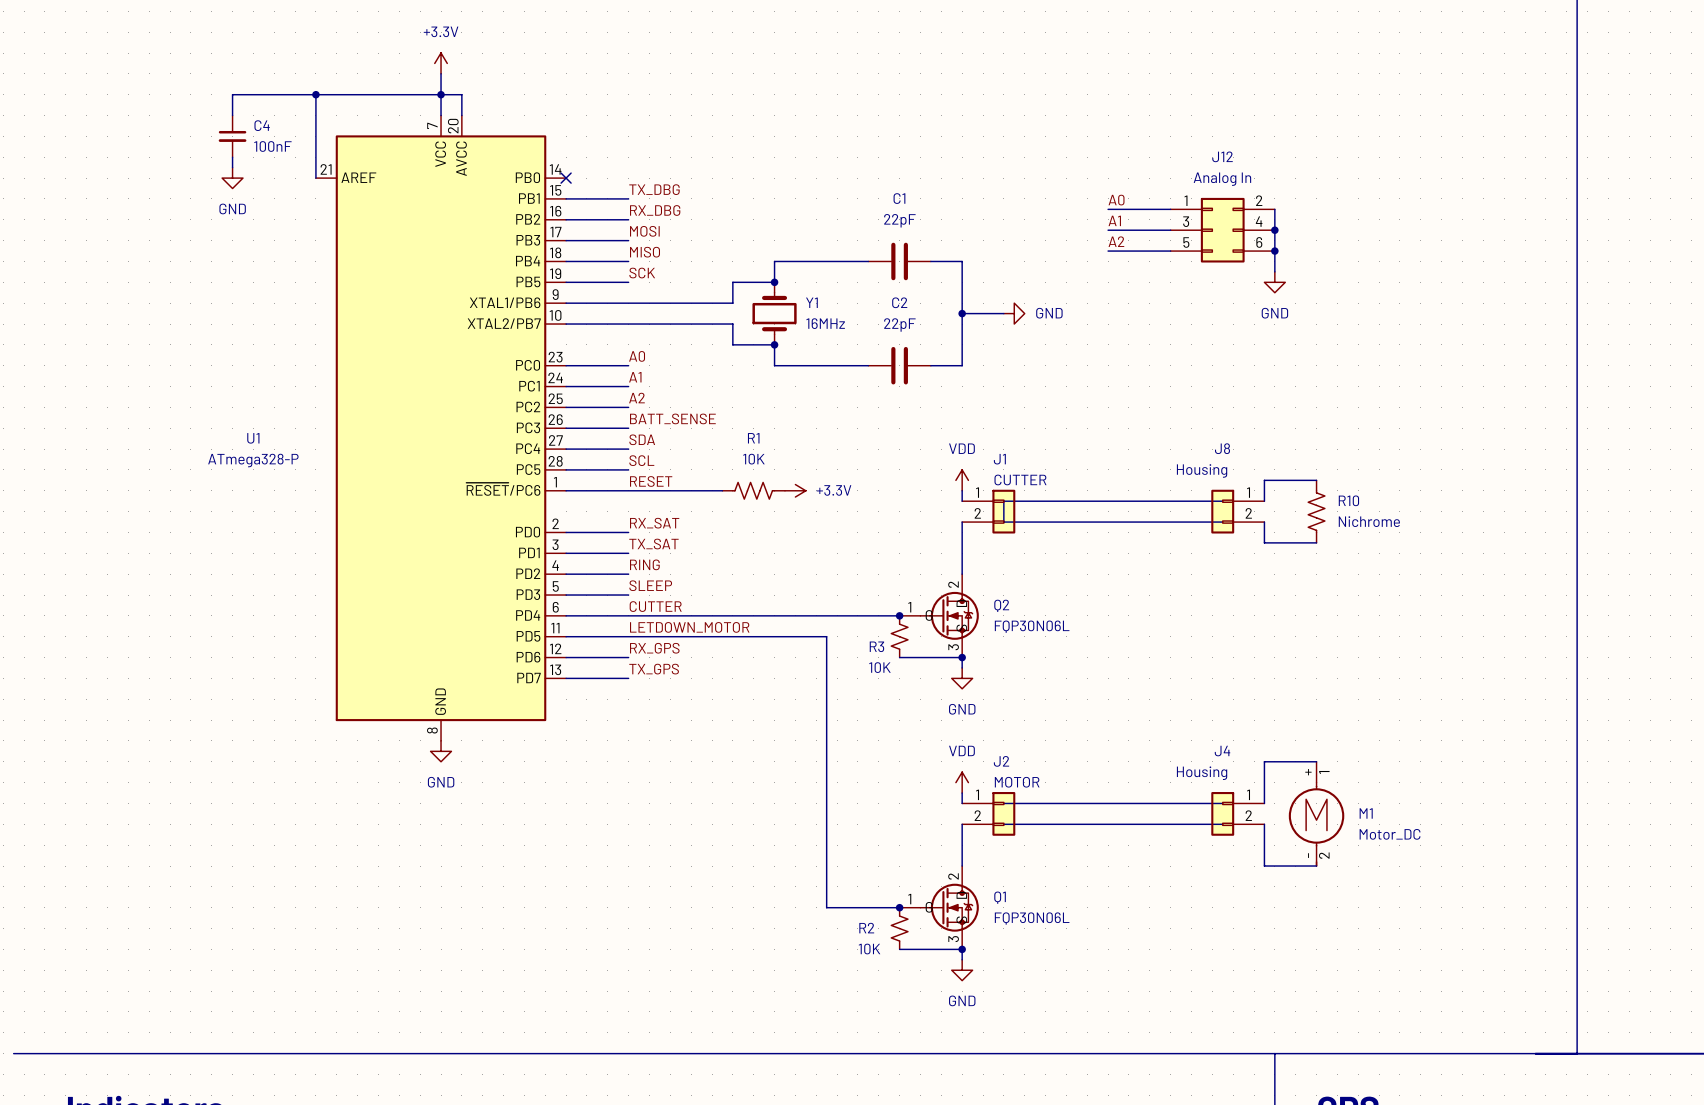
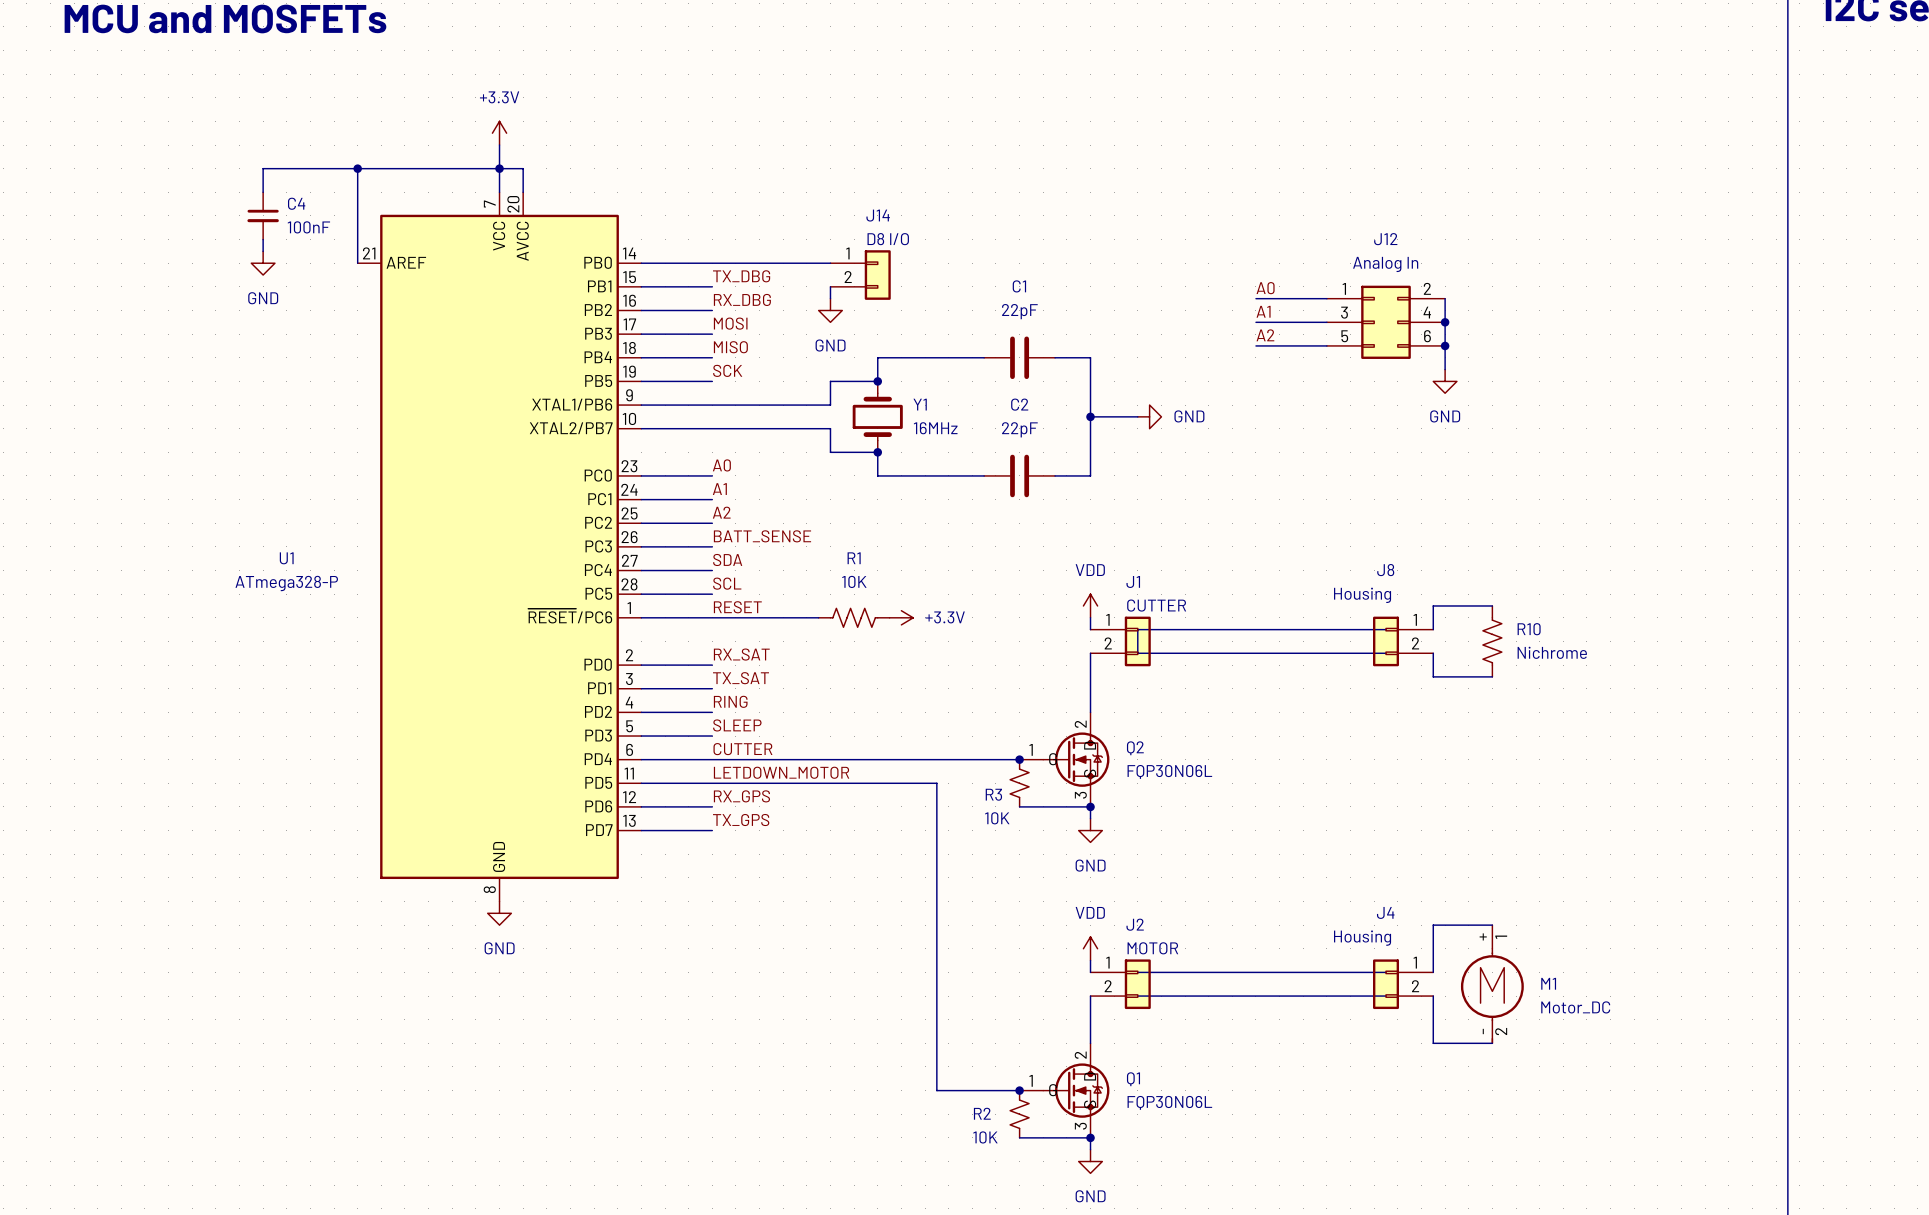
wire: none -> (641, 263) (830, 263)
no-connect mark: (566, 178) -> none
J14: none -> D8 I/O (860, 275)
wire: none -> (830, 286) (830, 298)
power symbol: none -> GND (830, 310)

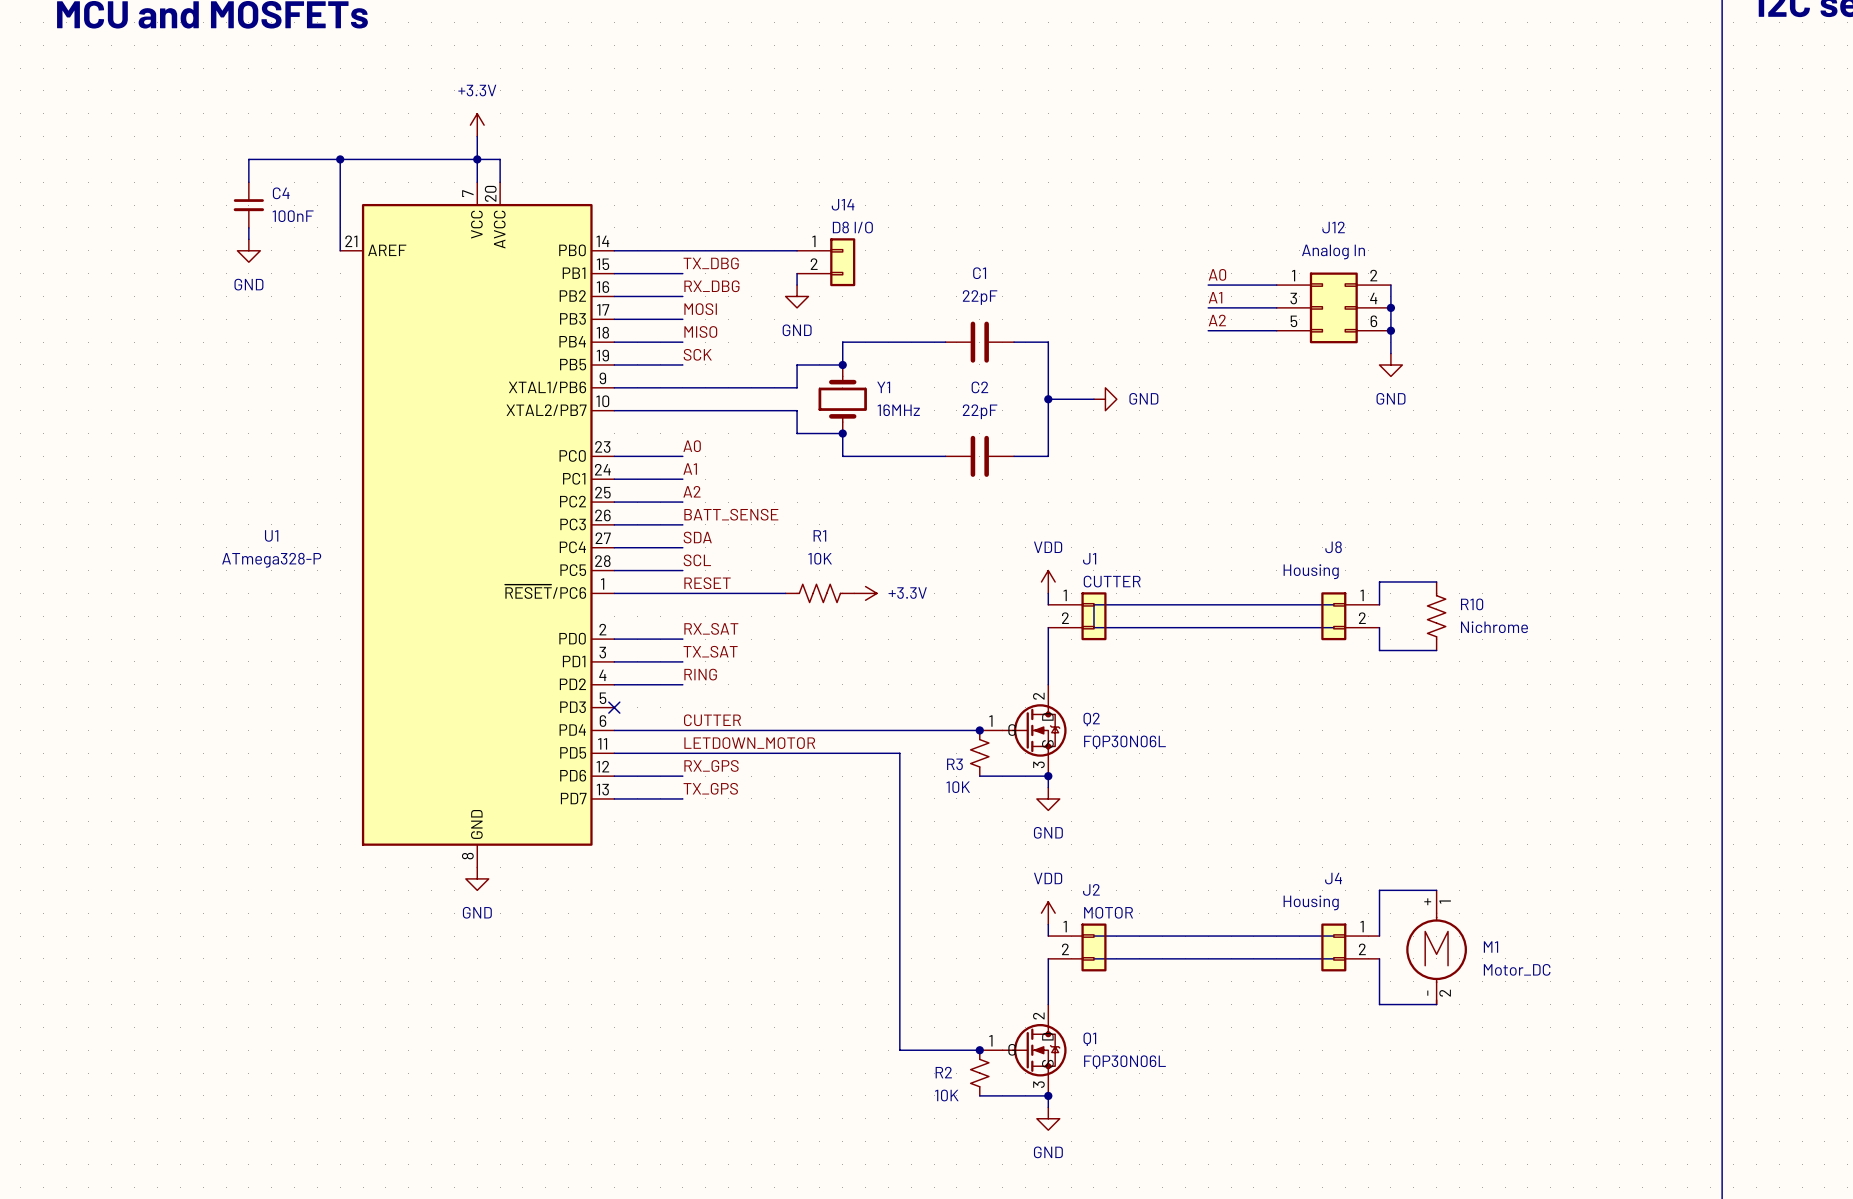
label: SLEEP (737, 725) -> none
wire: (641, 736) (712, 736) -> none
no-connect mark: none -> (614, 707)

